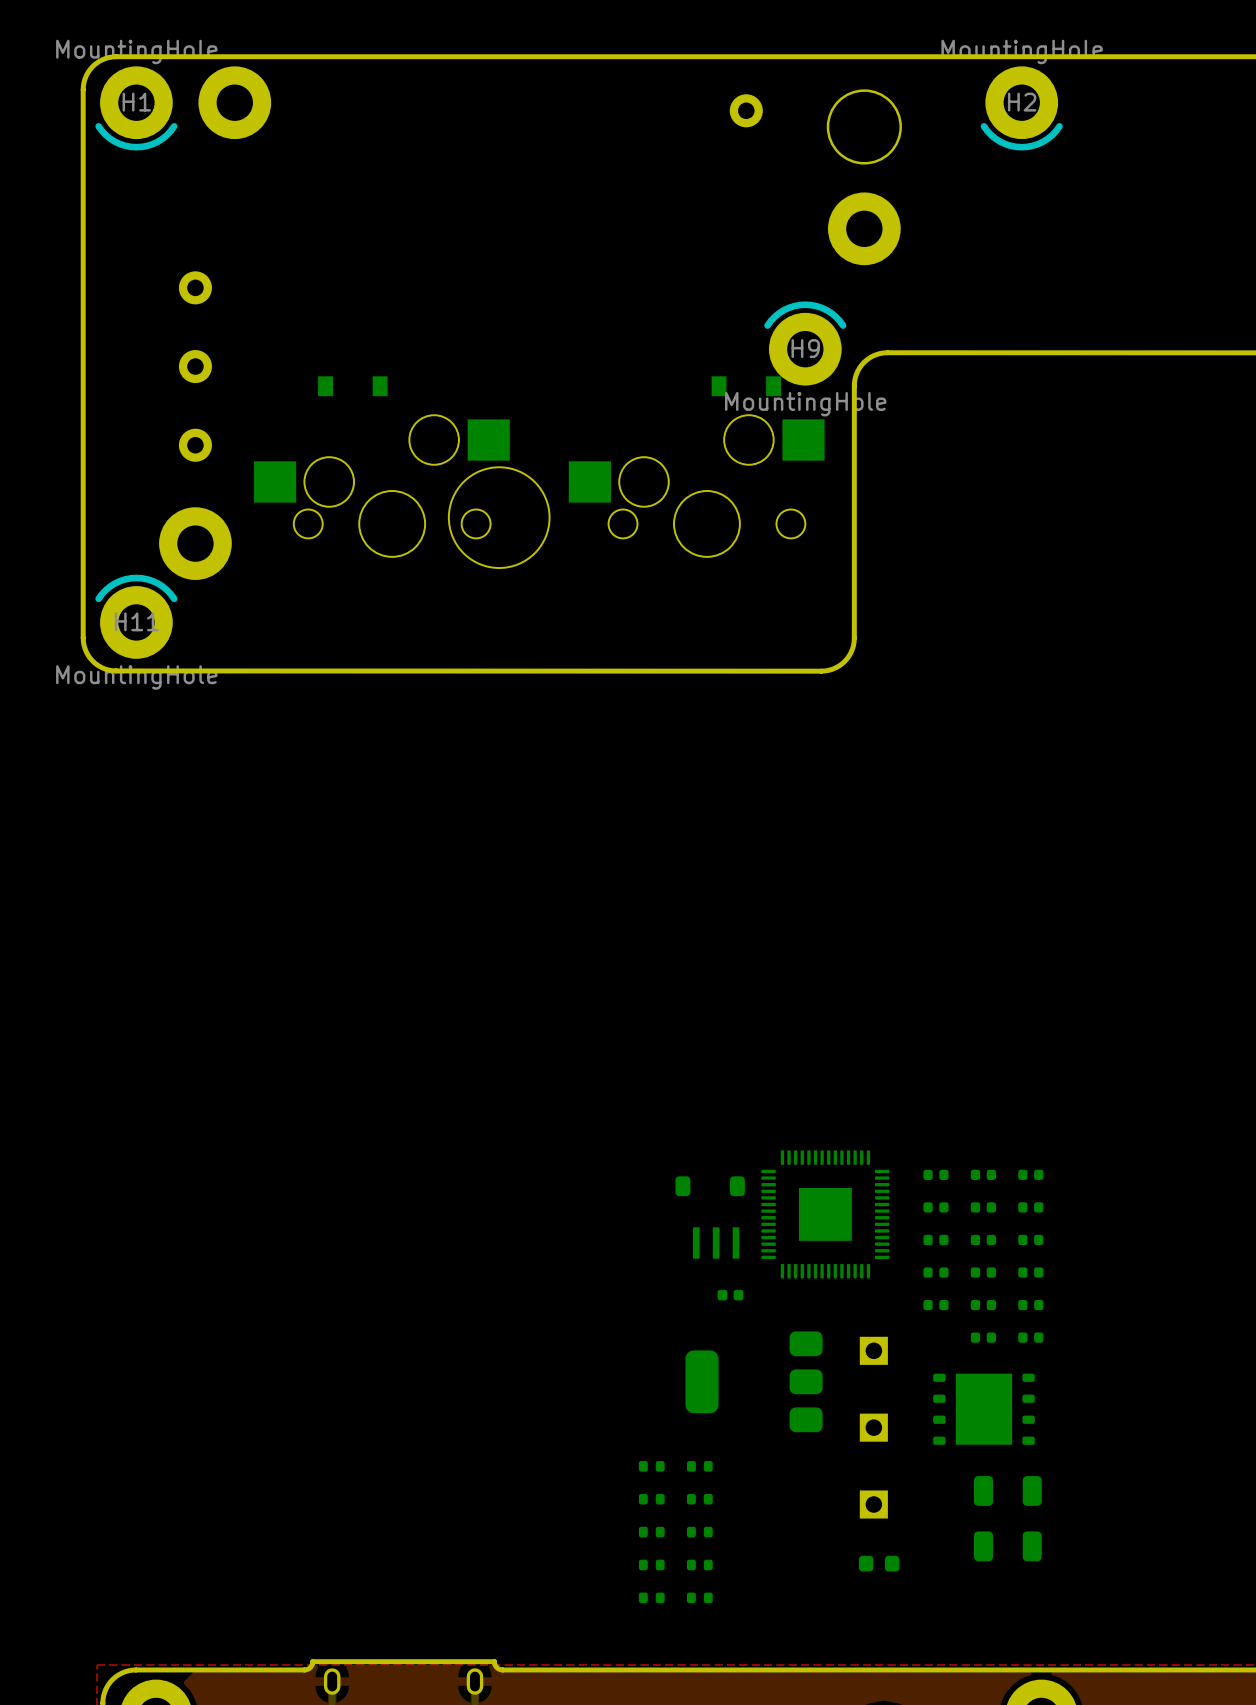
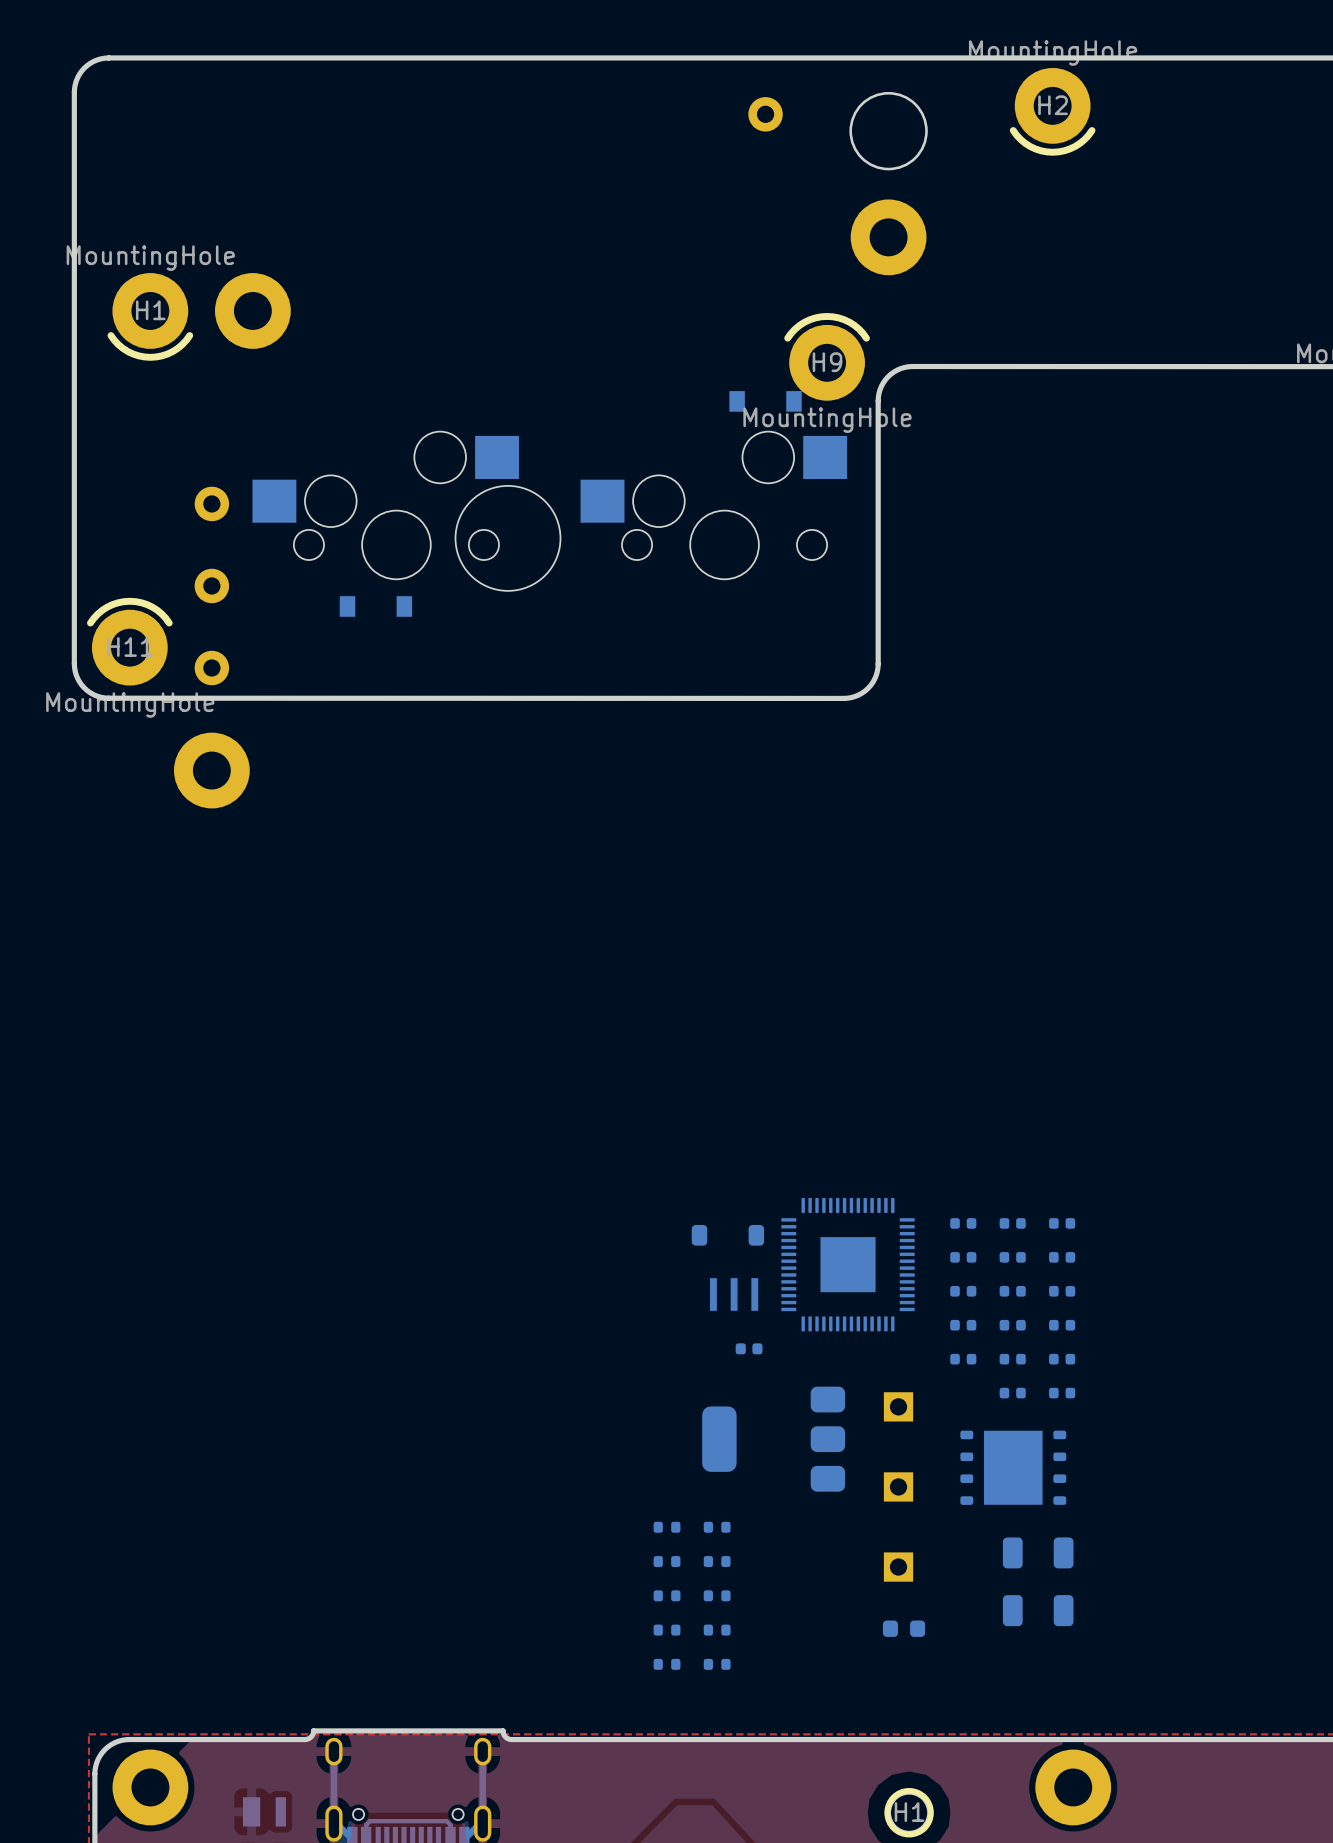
part: (234, 102) -> none
H1 position: (136, 108) -> (150, 316)
part: (195, 287) -> none
part: none -> (252, 310)
part: (195, 366) -> none
part position: (352, 386) -> (375, 606)
part position: (195, 445) -> (211, 503)
part: (195, 543) -> none
part: none -> (211, 585)
part: none -> (211, 667)
part: none -> (211, 770)

